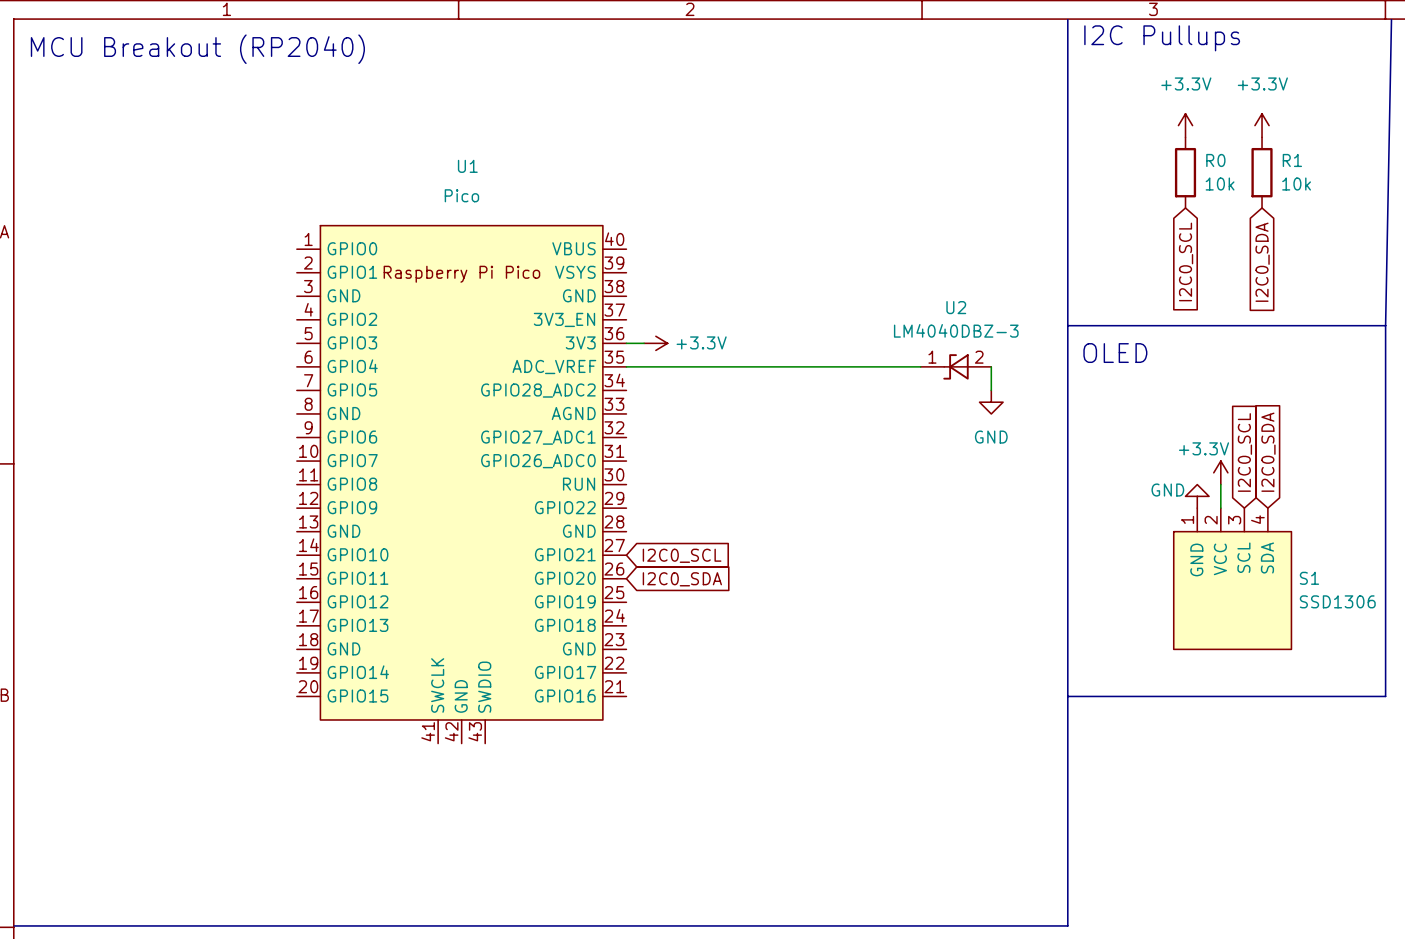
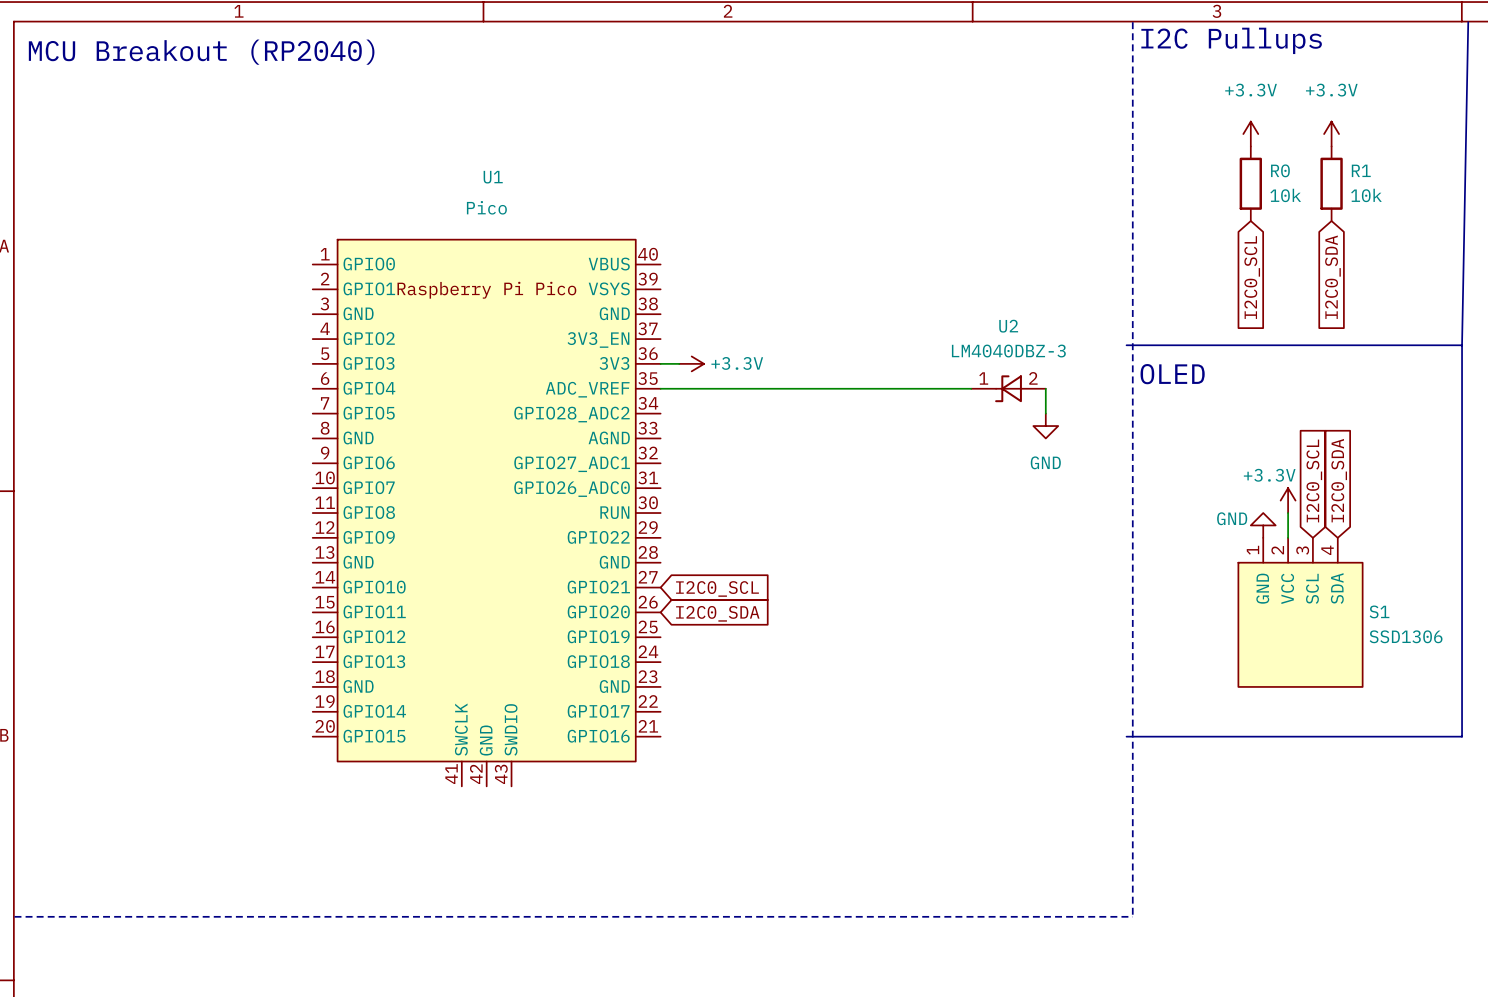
line: (1067, 19) (1067, 925) (14, 925) -> none
line: none -> (1132, 22) (1132, 916) (14, 916)

